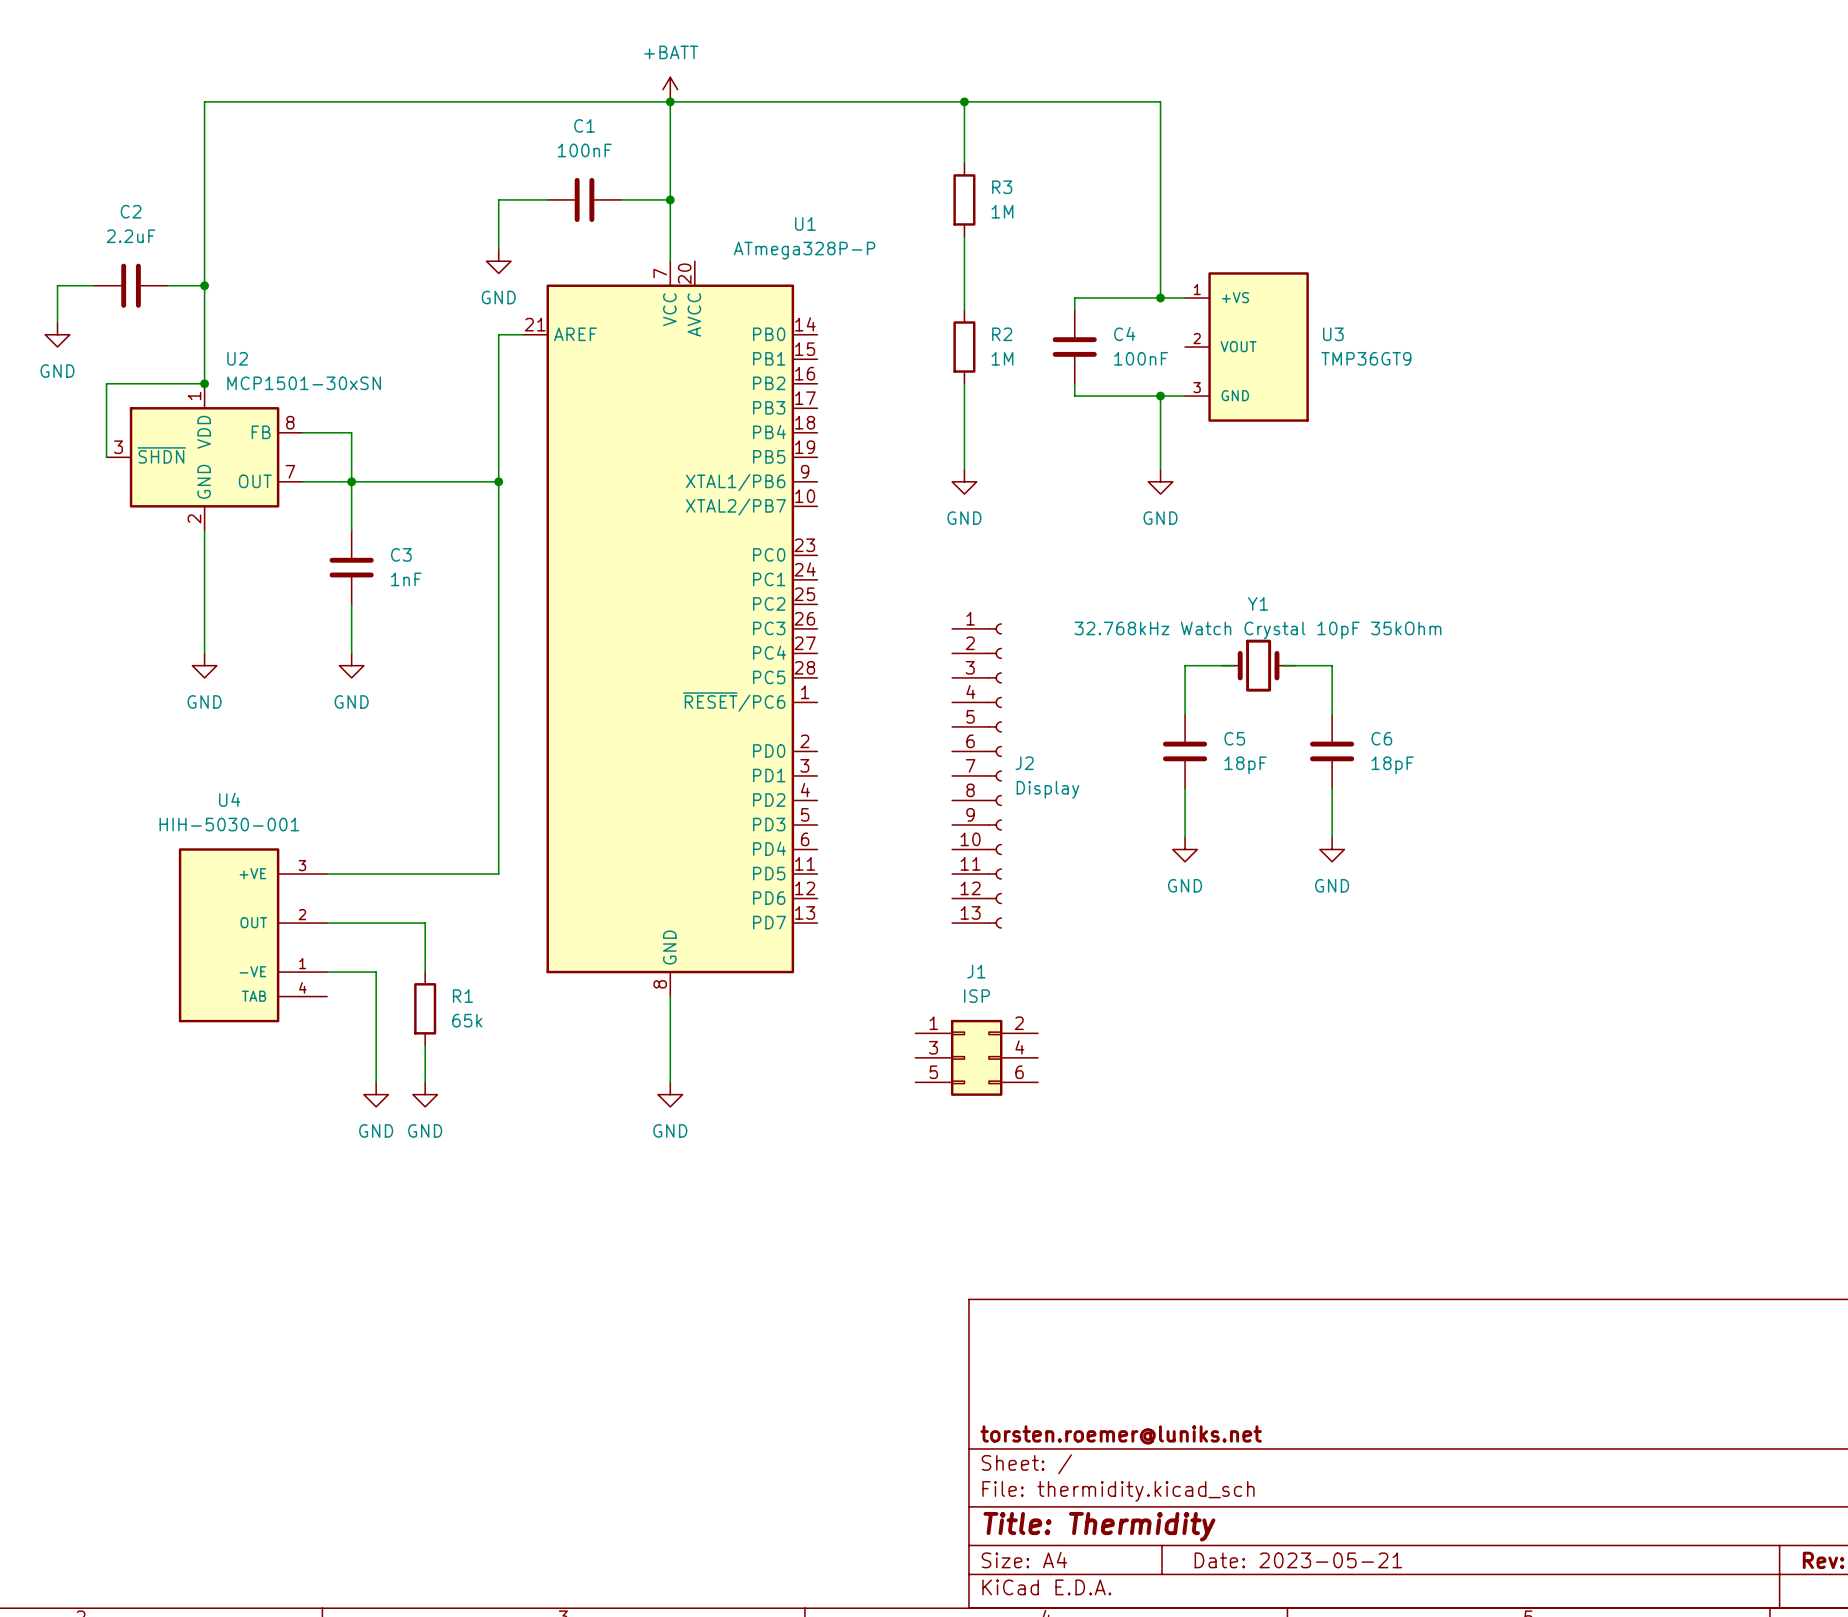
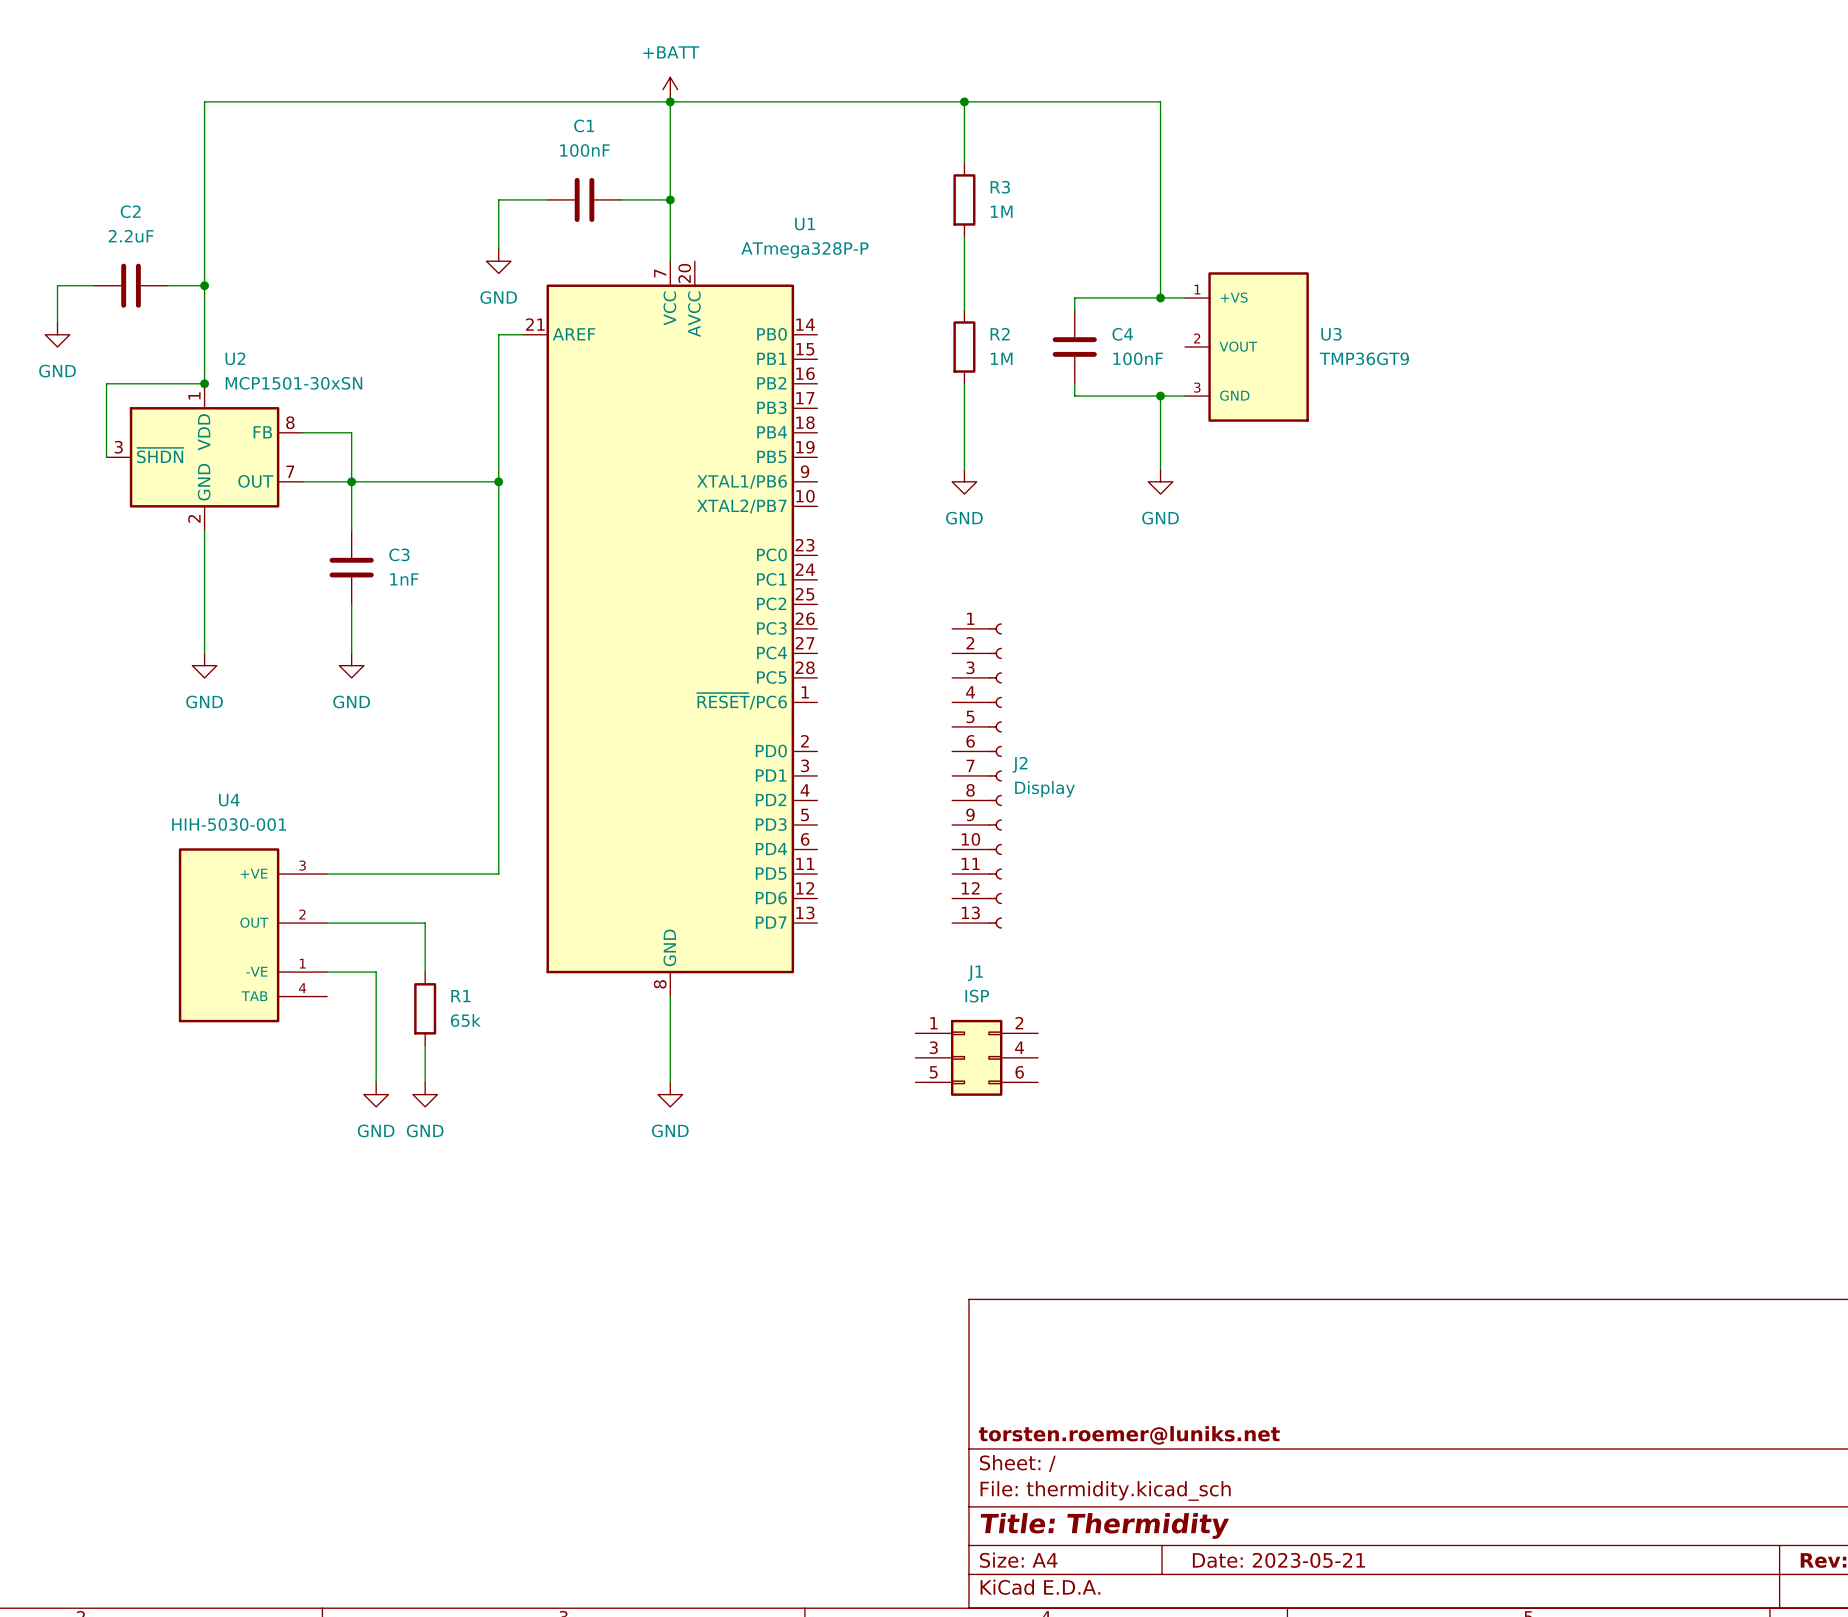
wire: (1234, 665) (1185, 665) (1185, 714) -> none
Y1: 32.768kHz Watch Crystal 10pF 35kOhm (1258, 665) -> none
wire: (1283, 665) (1332, 665) (1332, 714) -> none
C5: 18pF (1185, 751) -> none
C6: 18pF (1332, 751) -> none
wire: (1185, 788) (1185, 837) -> none
wire: (1332, 788) (1332, 837) -> none
power symbol: GND (1185, 849) -> none
power symbol: GND (1332, 849) -> none

